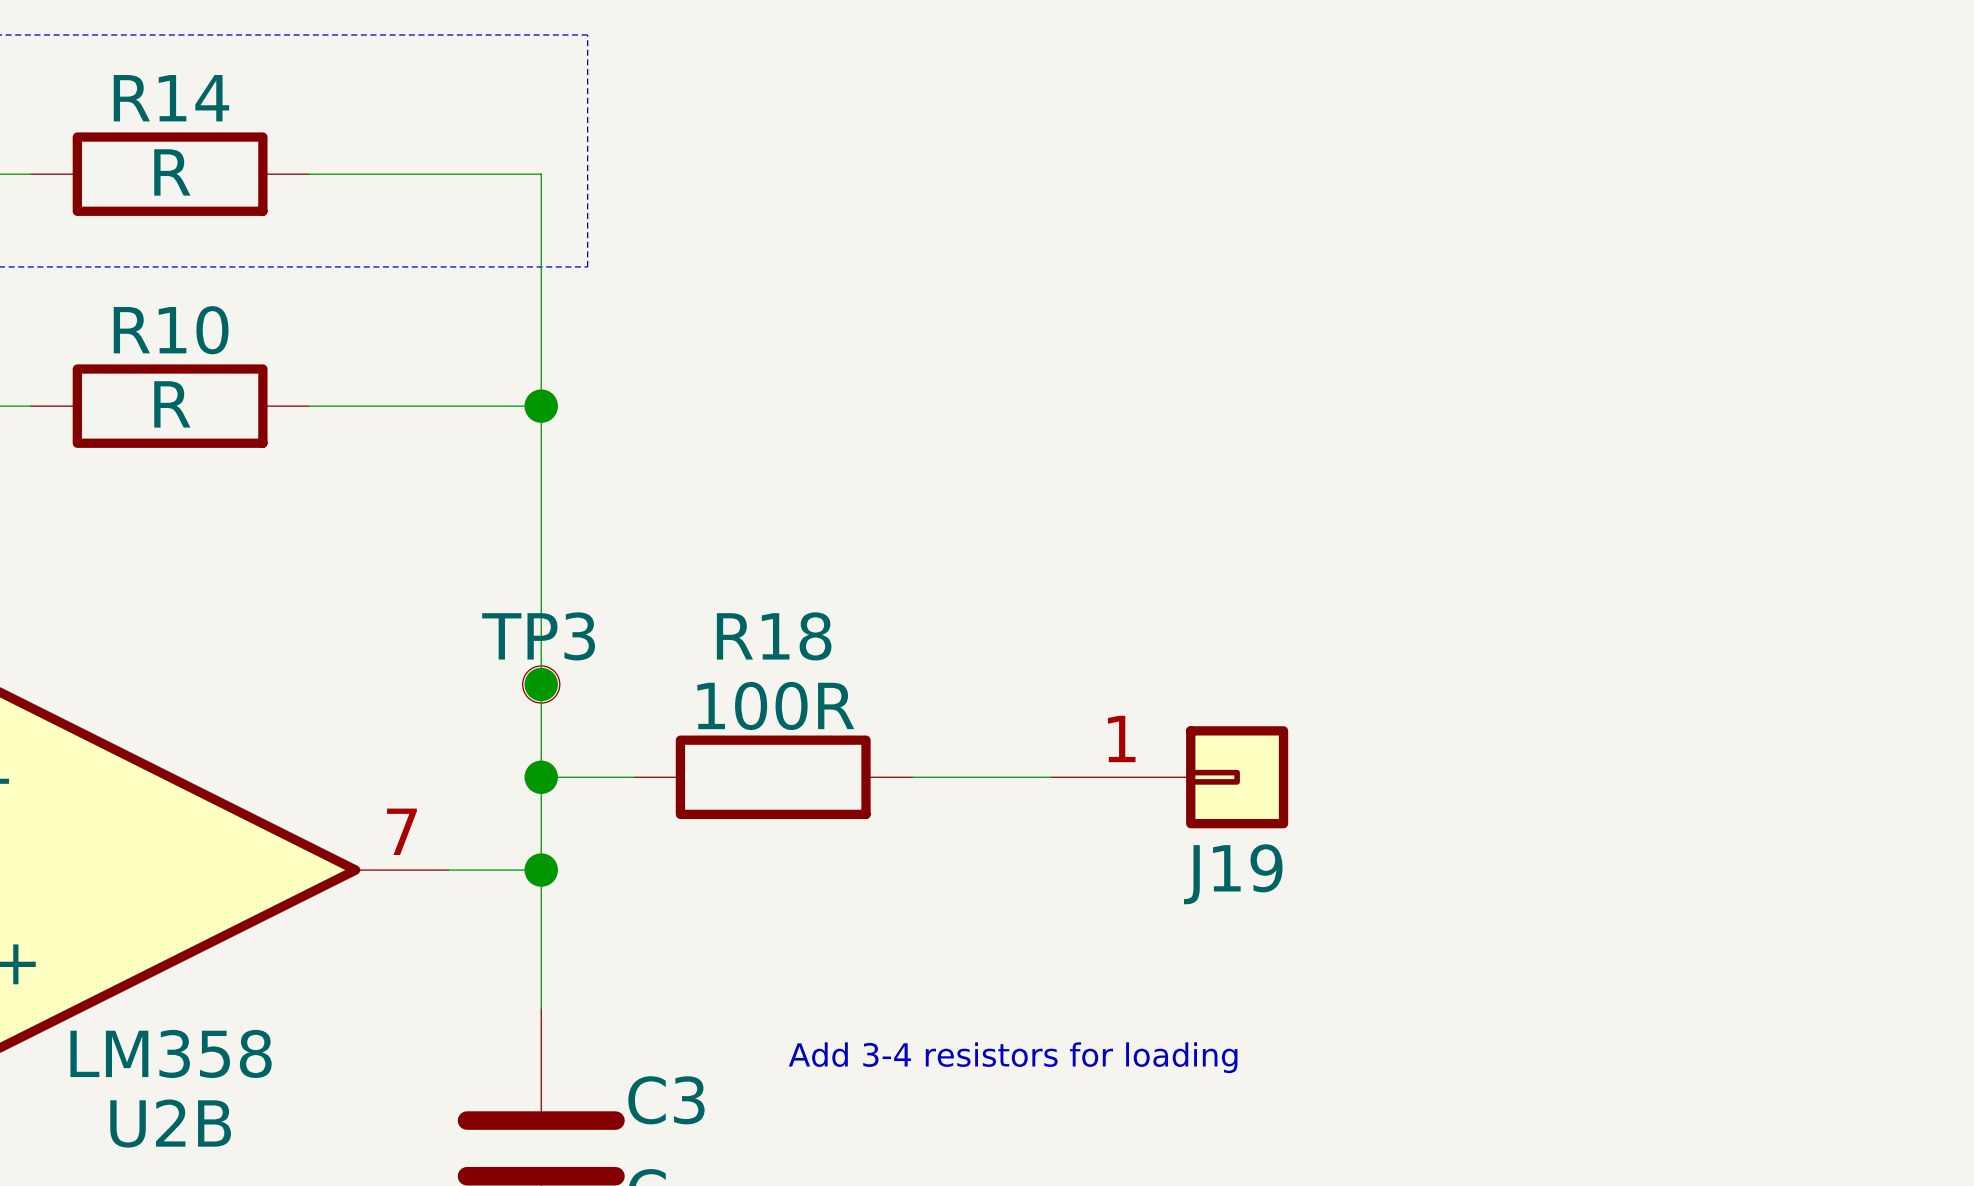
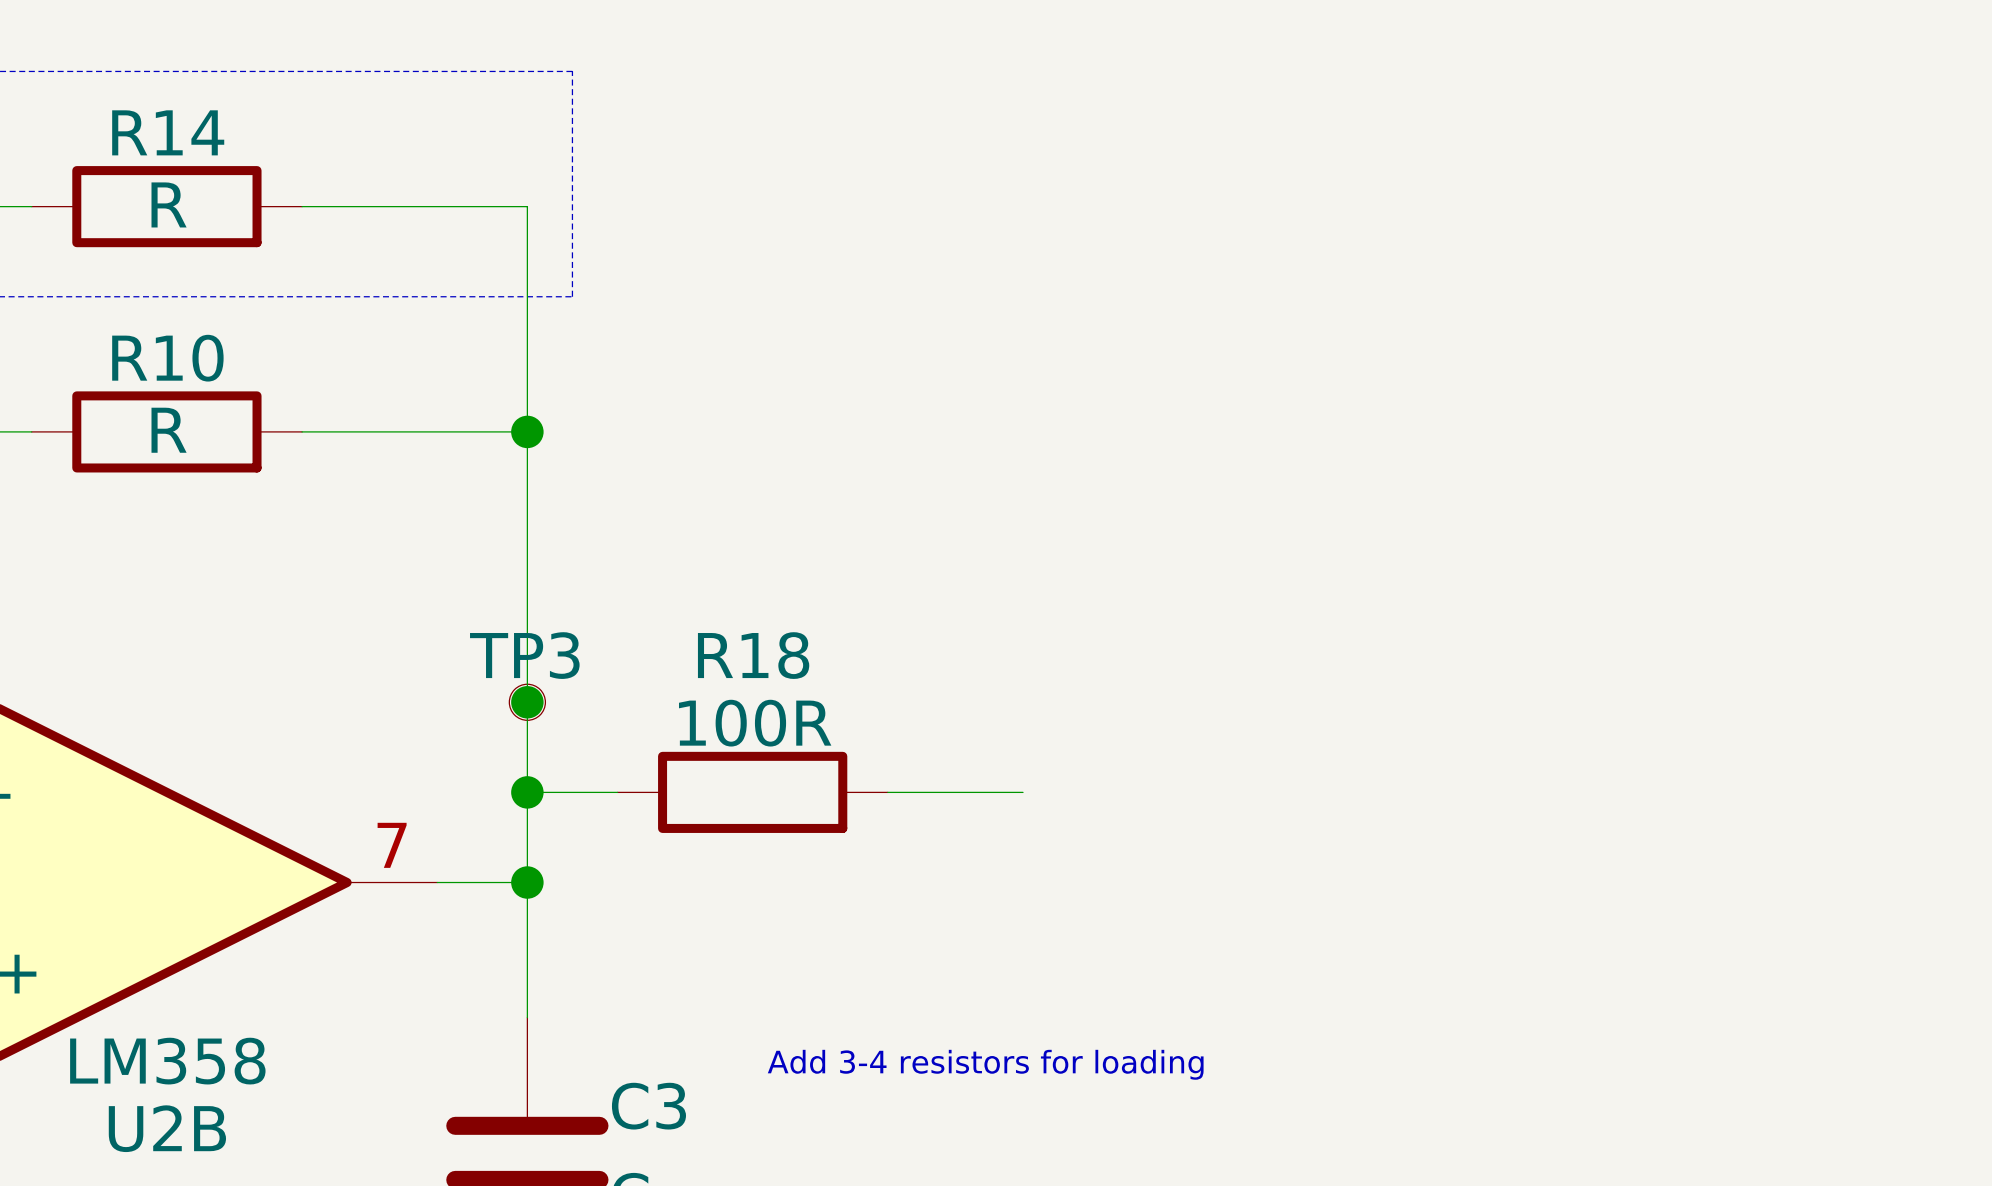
J19: (1169, 777) -> none

